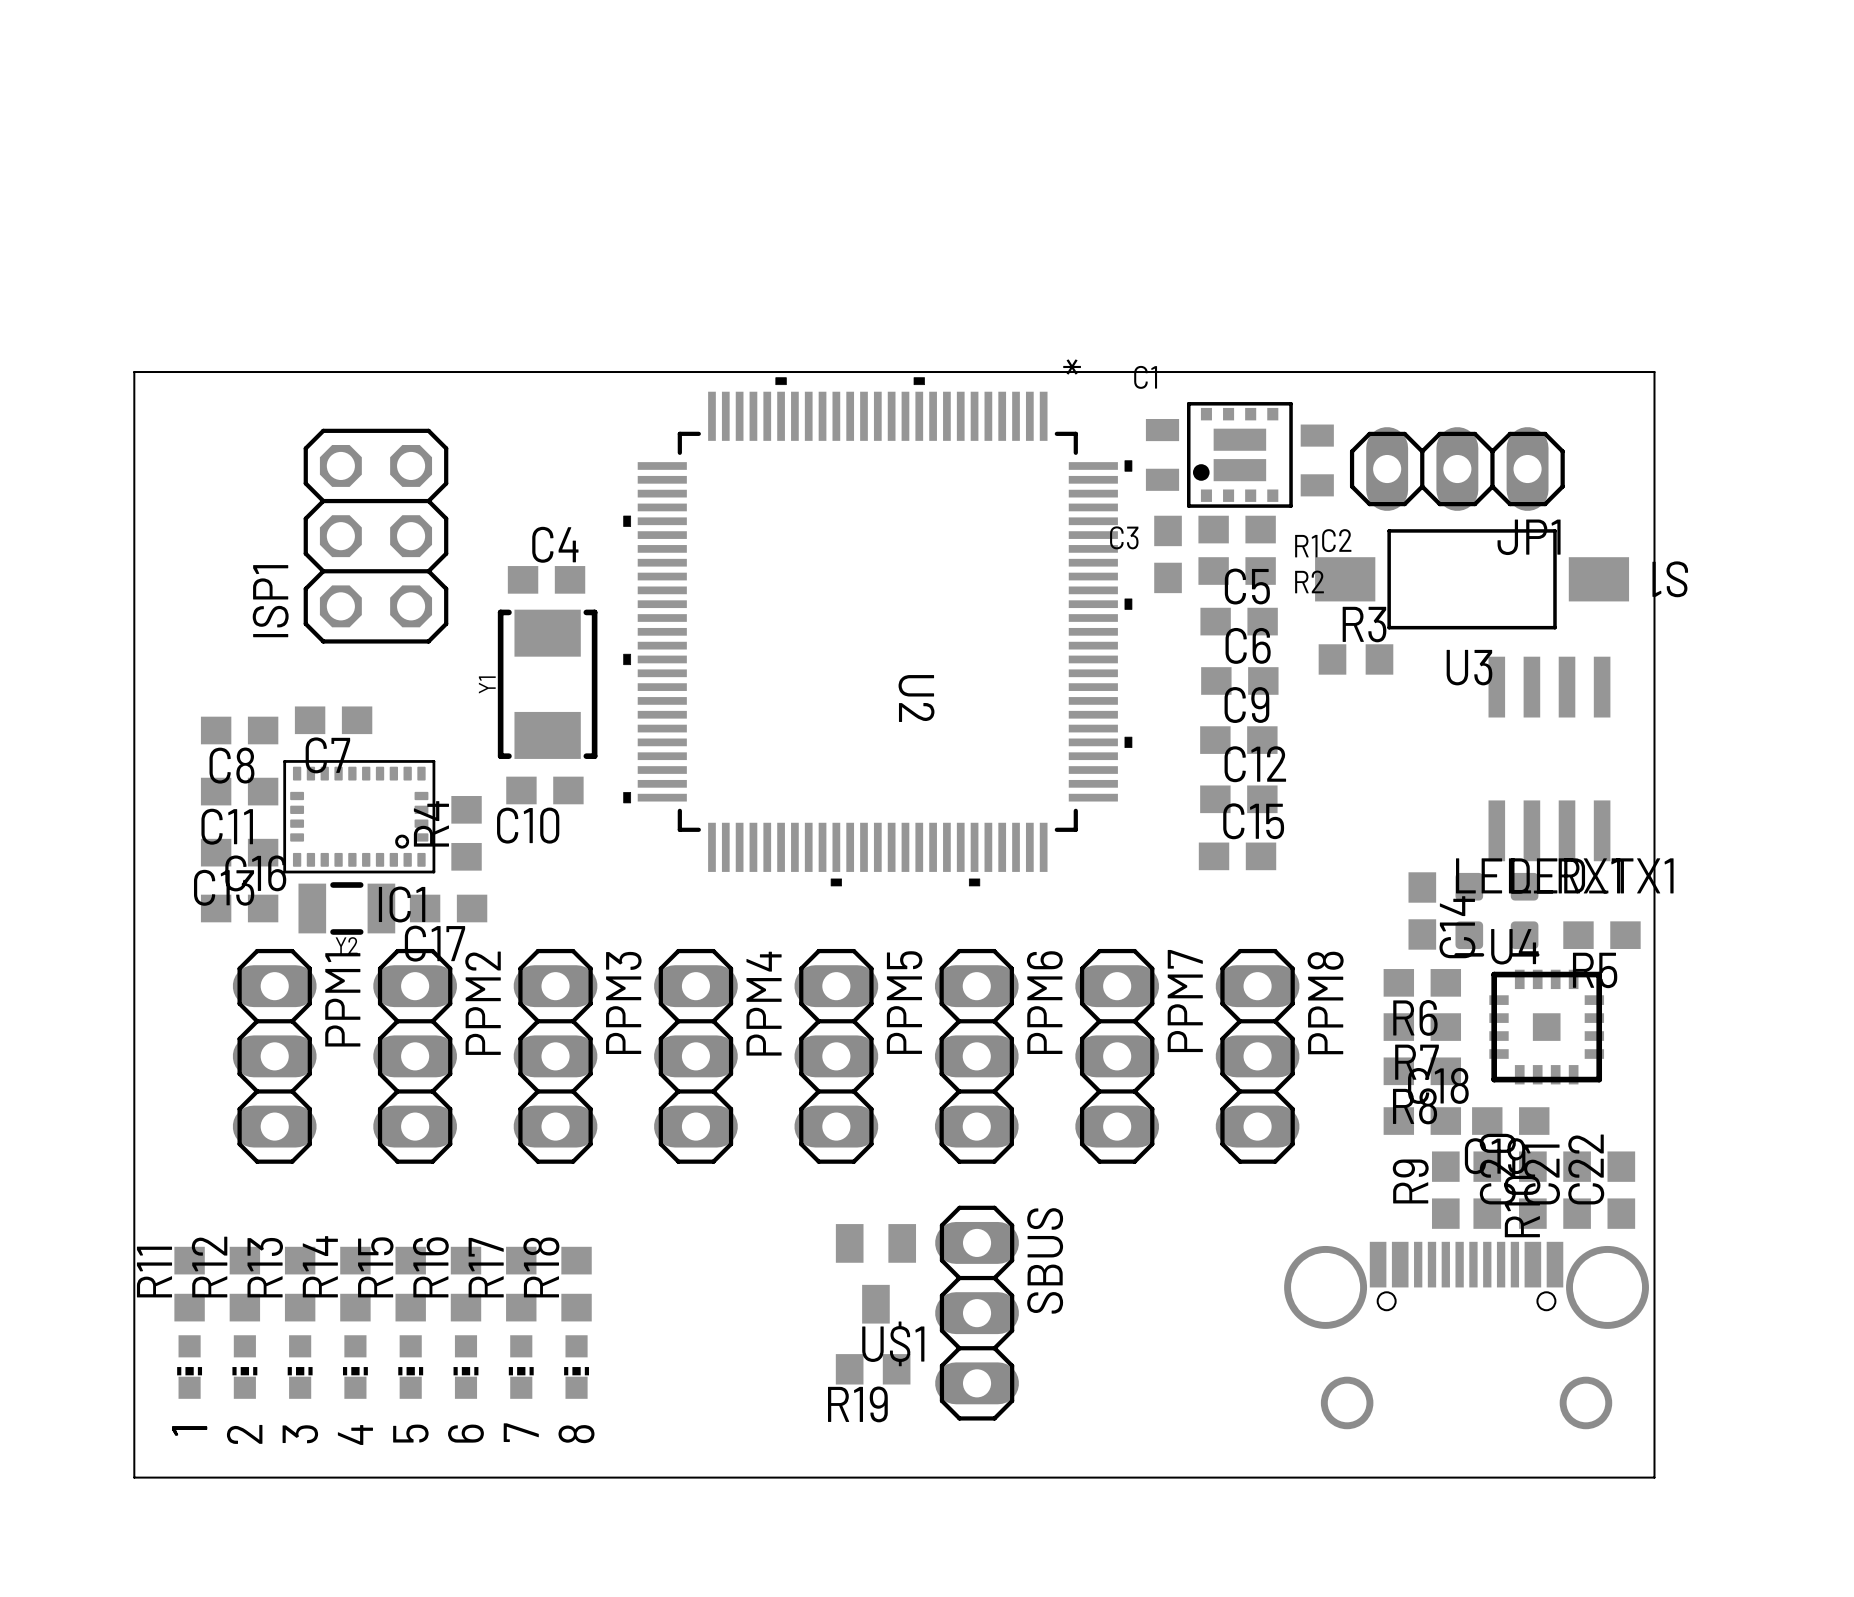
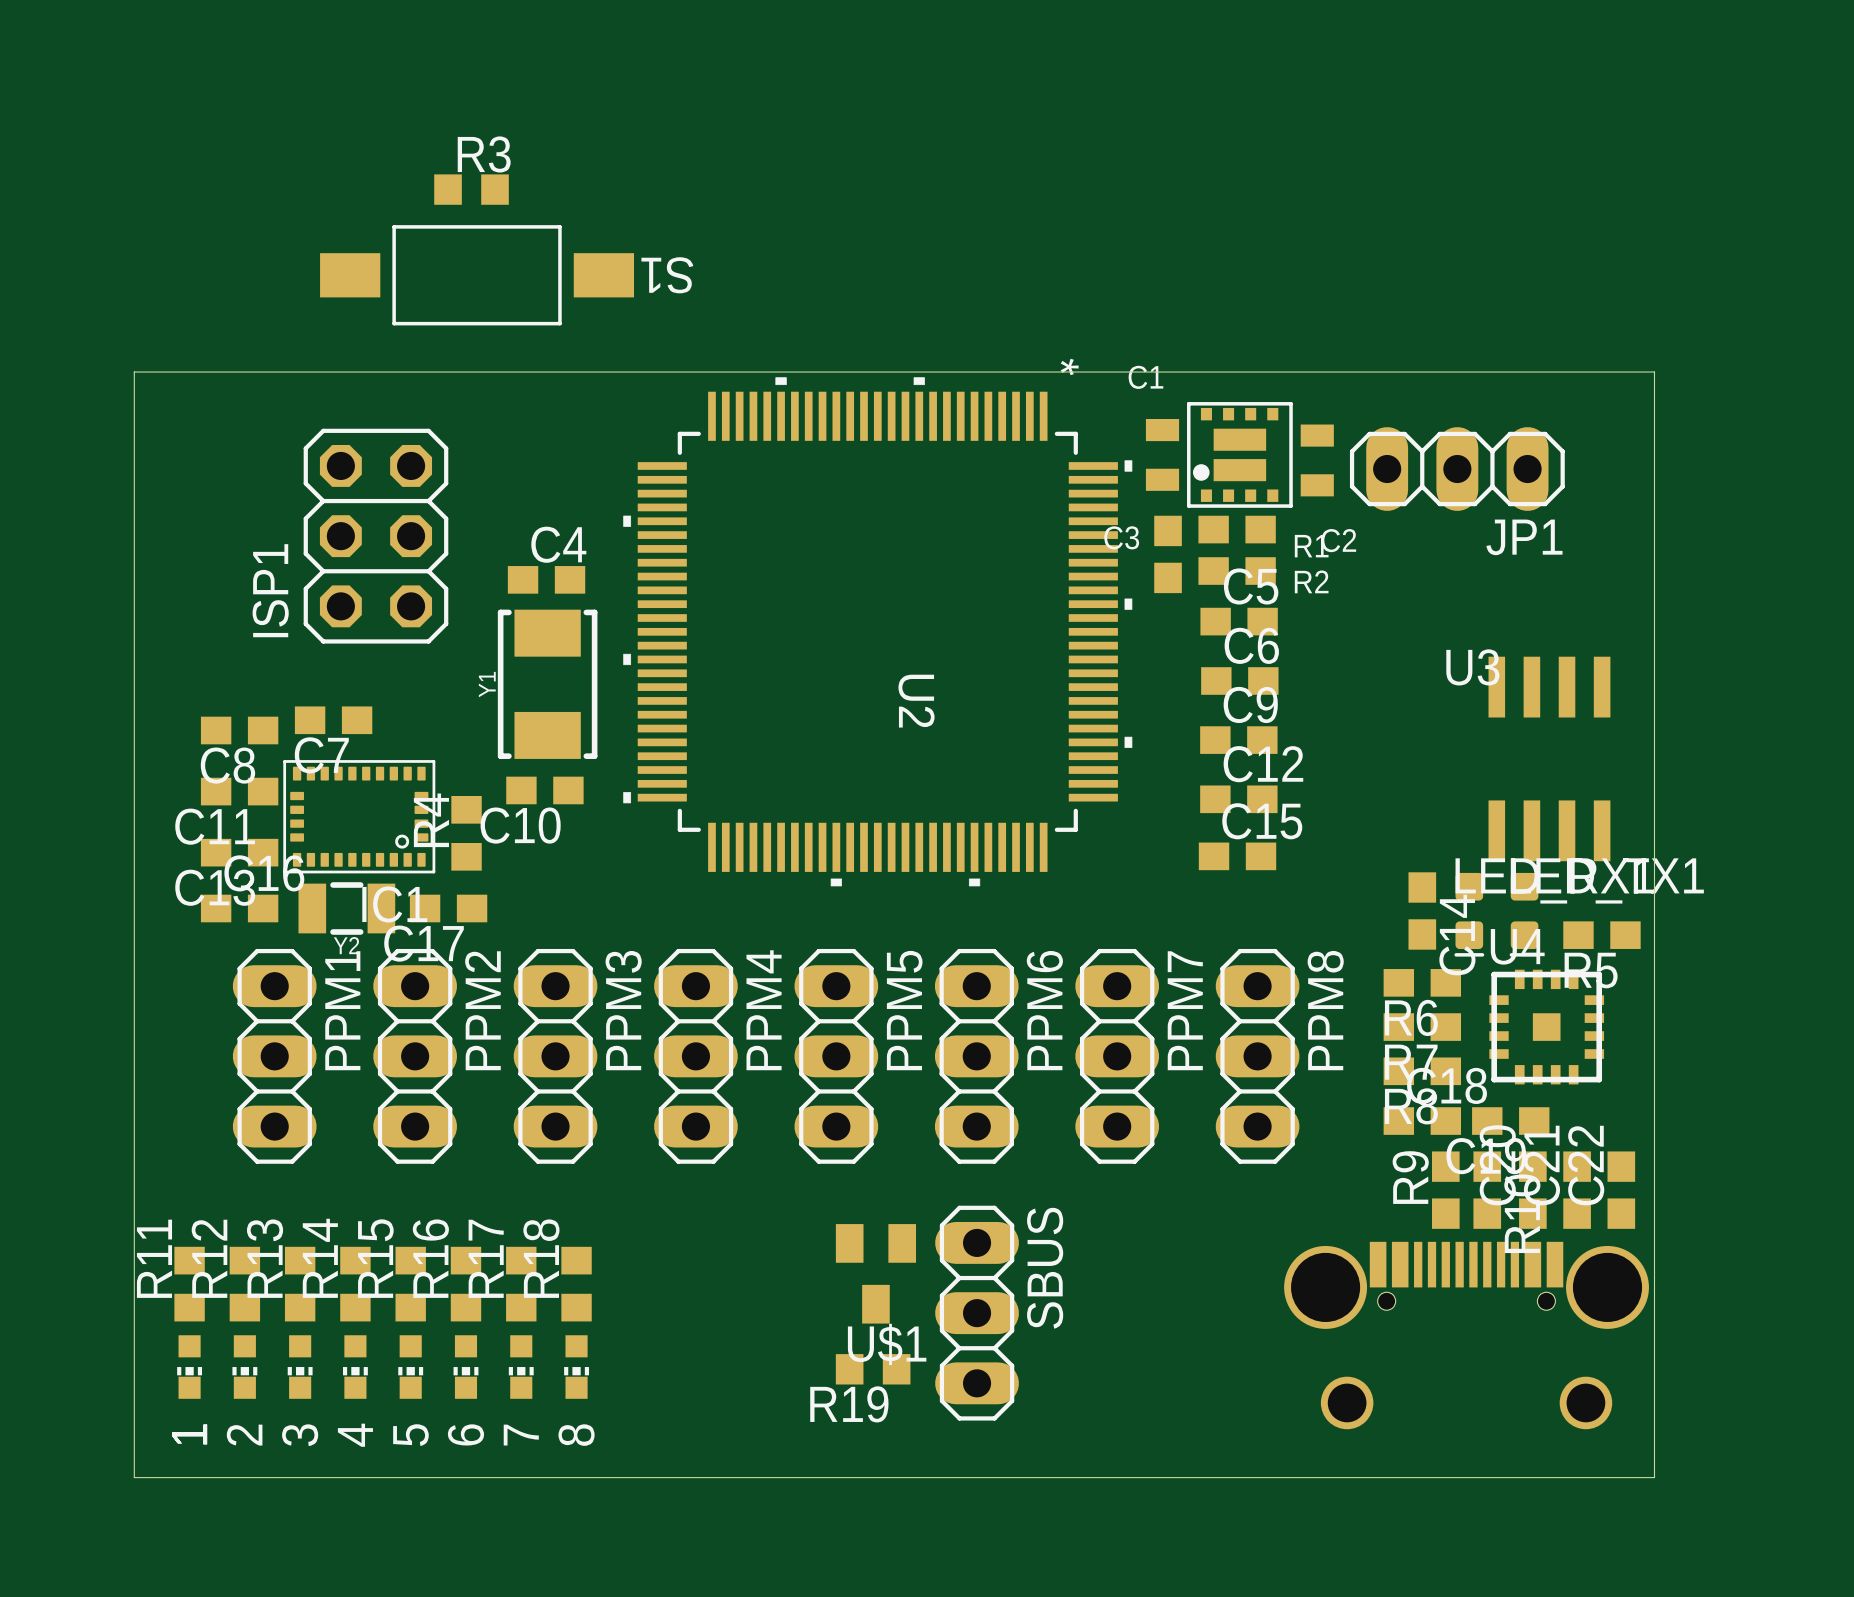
S1 position: (1472, 579) -> (477, 275)
R3 position: (1355, 659) -> (471, 189)

